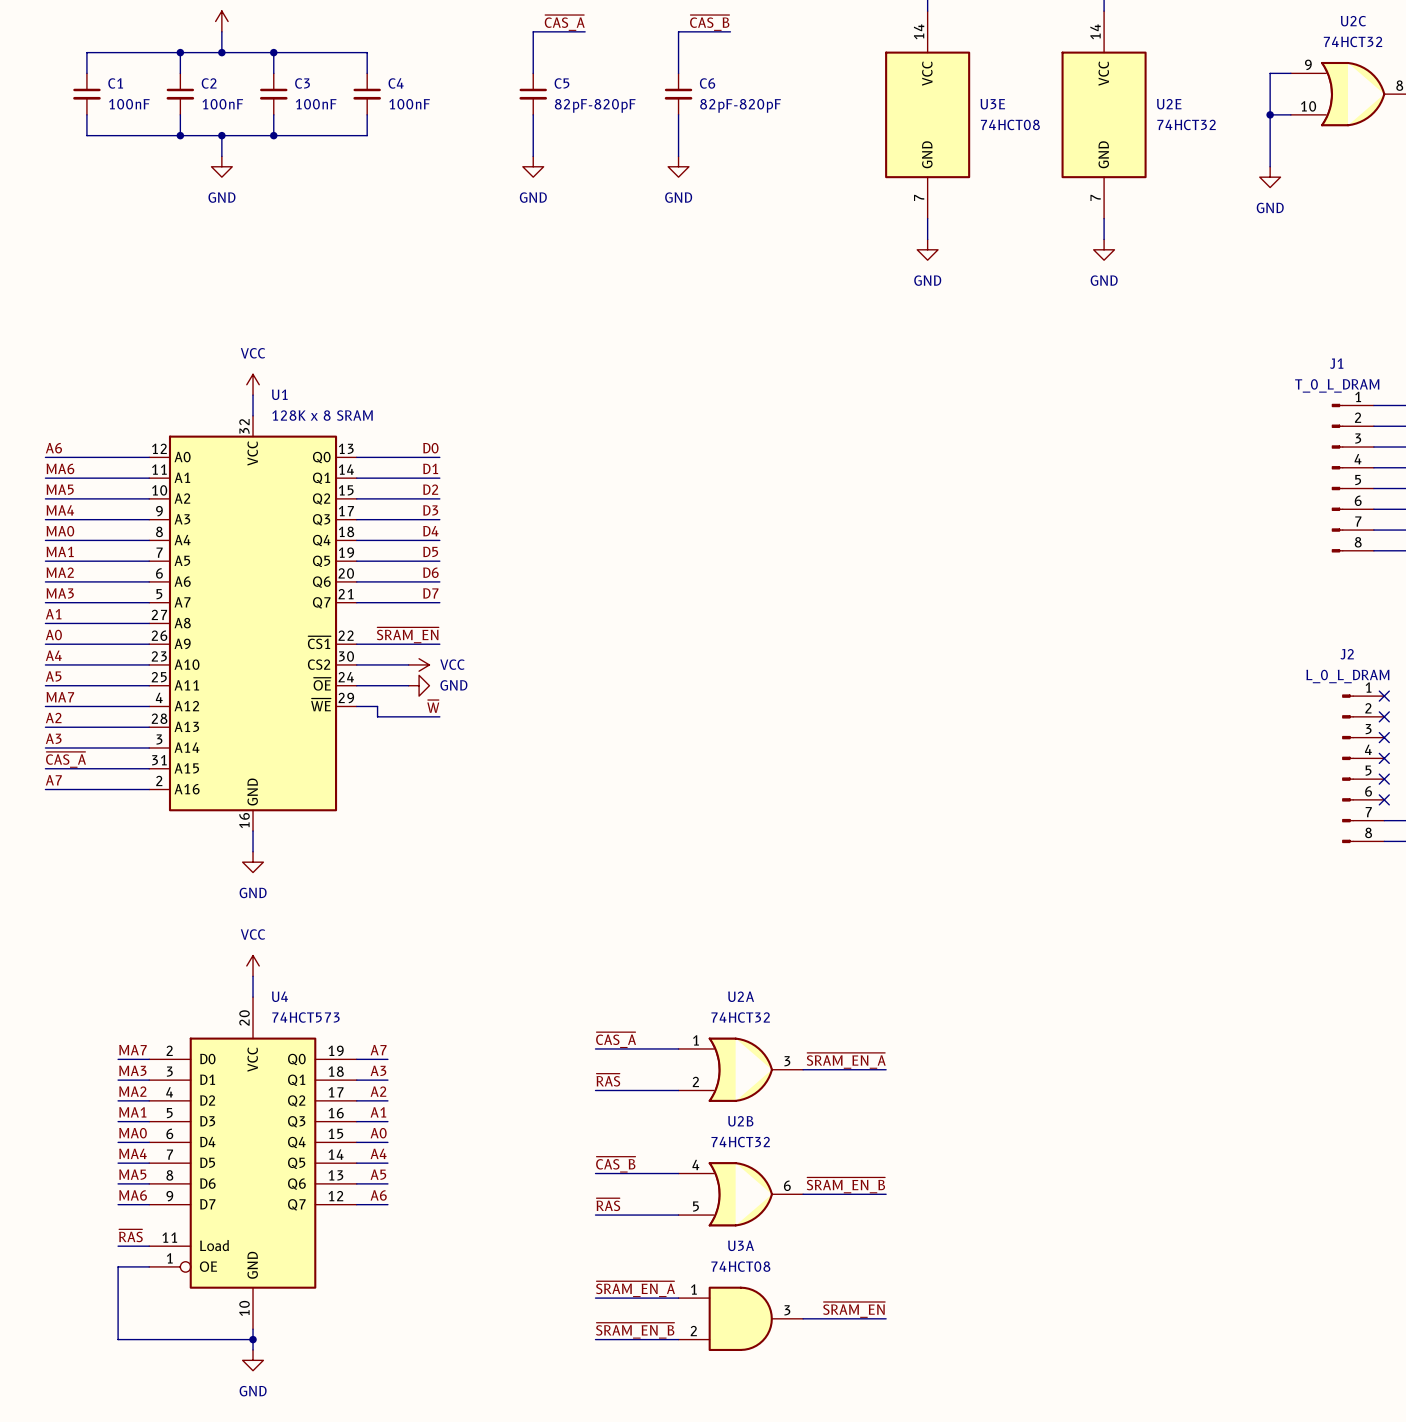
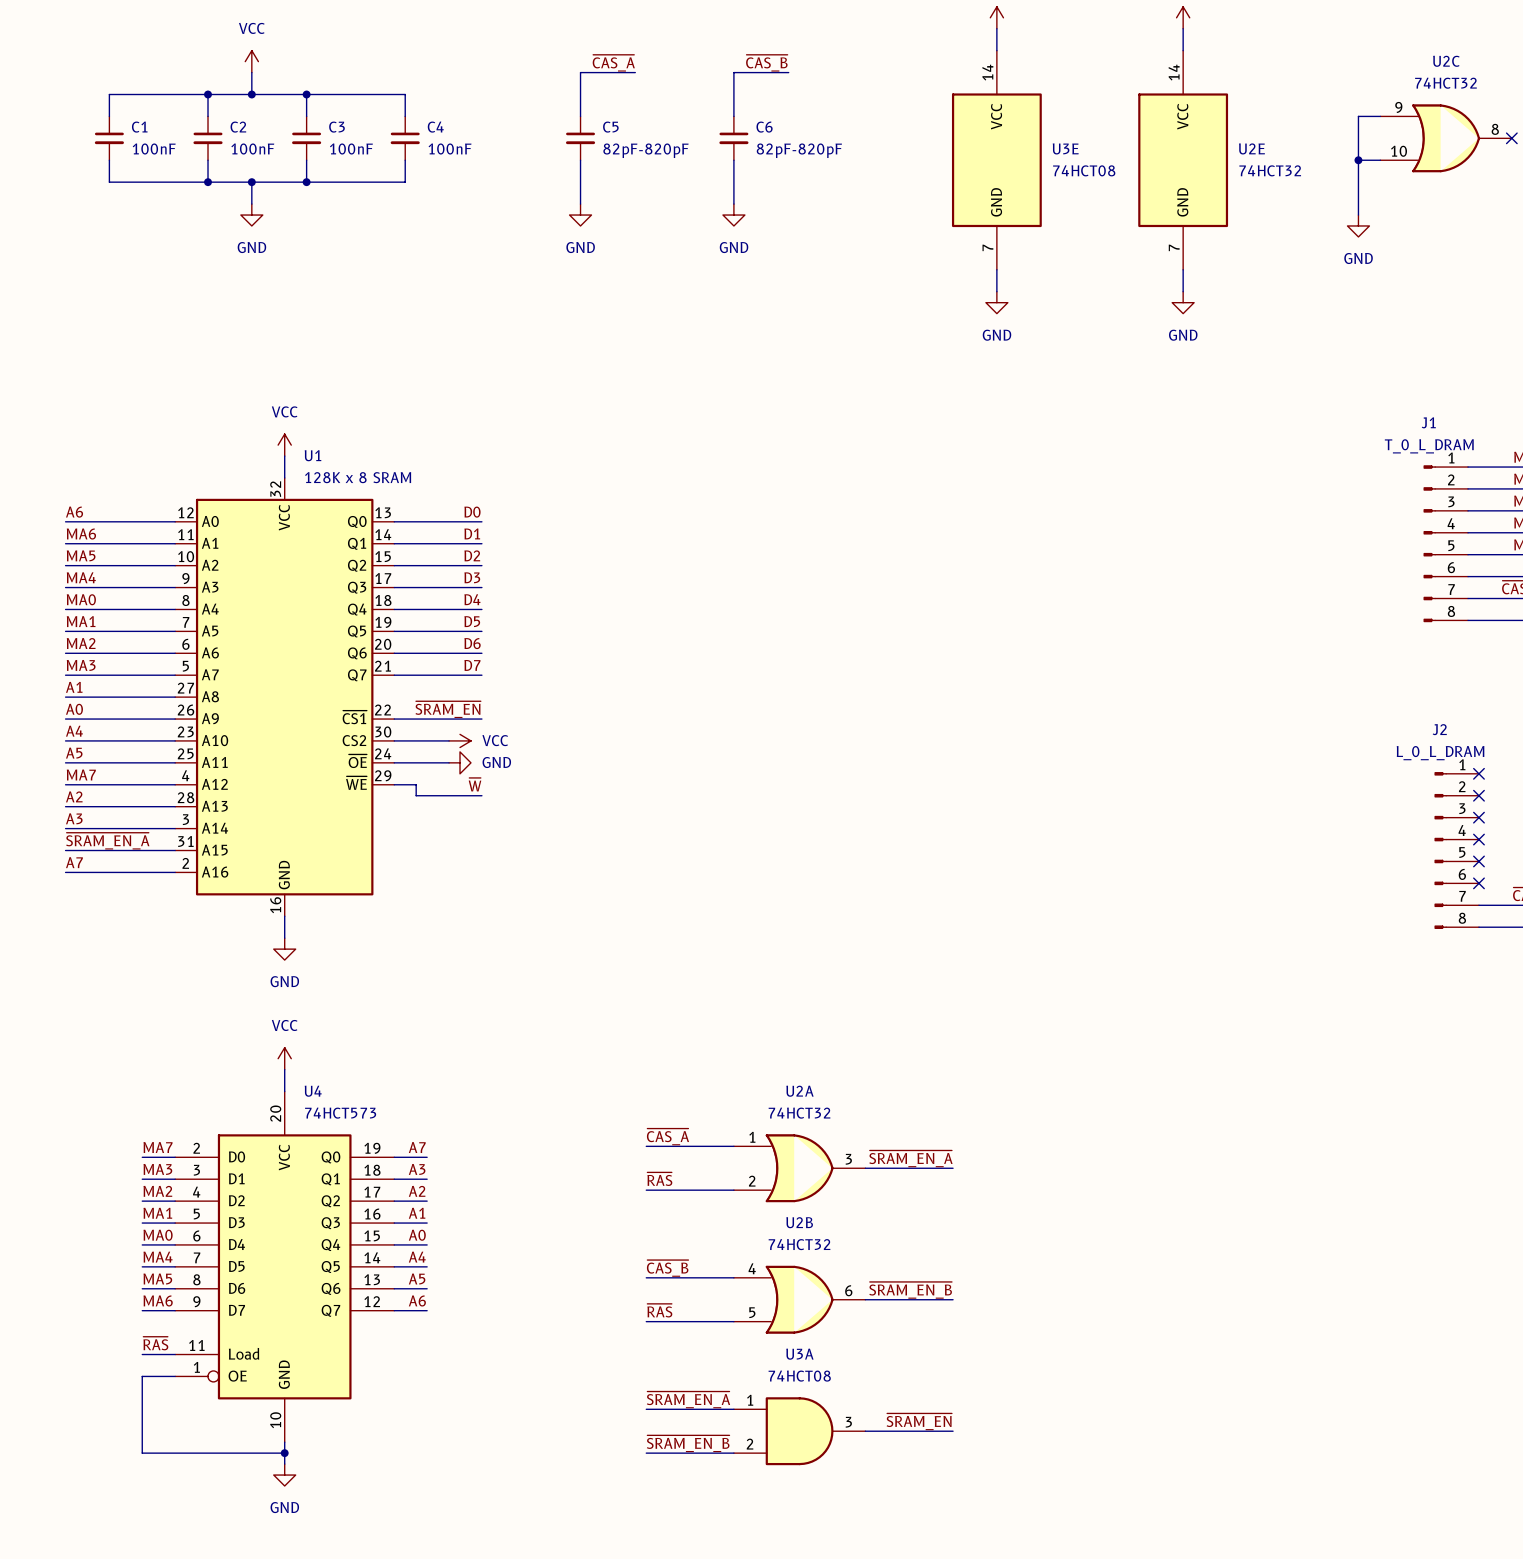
label: ~{CAS_A} (66, 759) -> ~{SRAM_EN_A} (107, 841)

